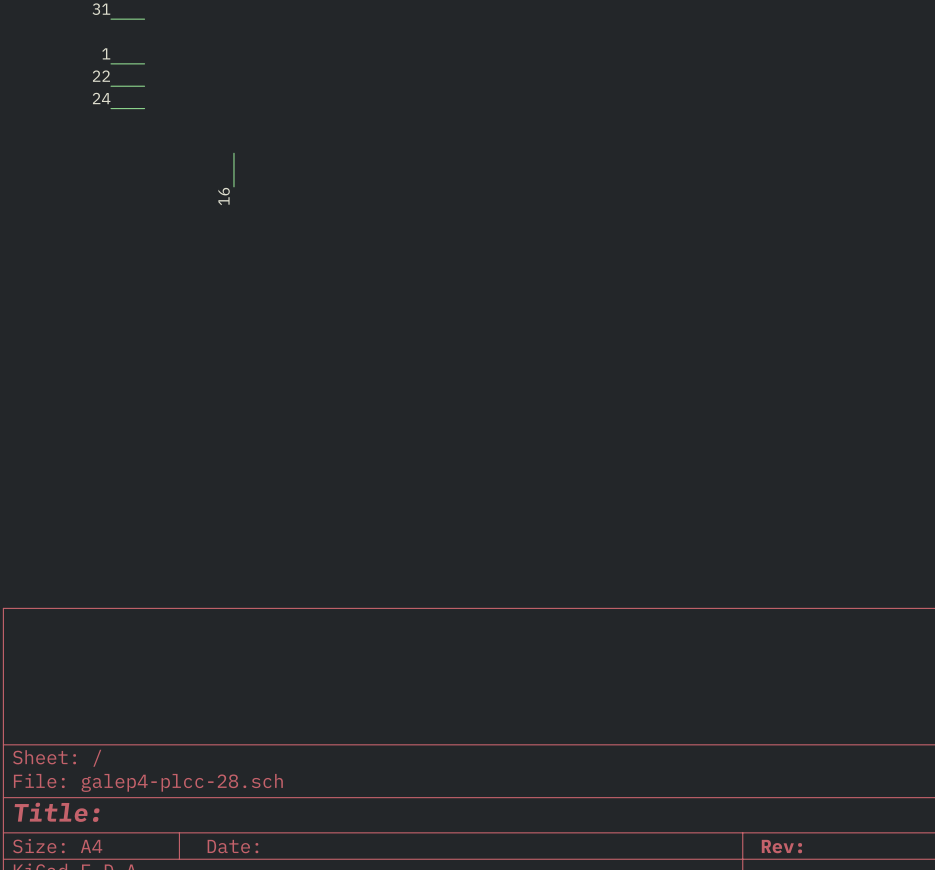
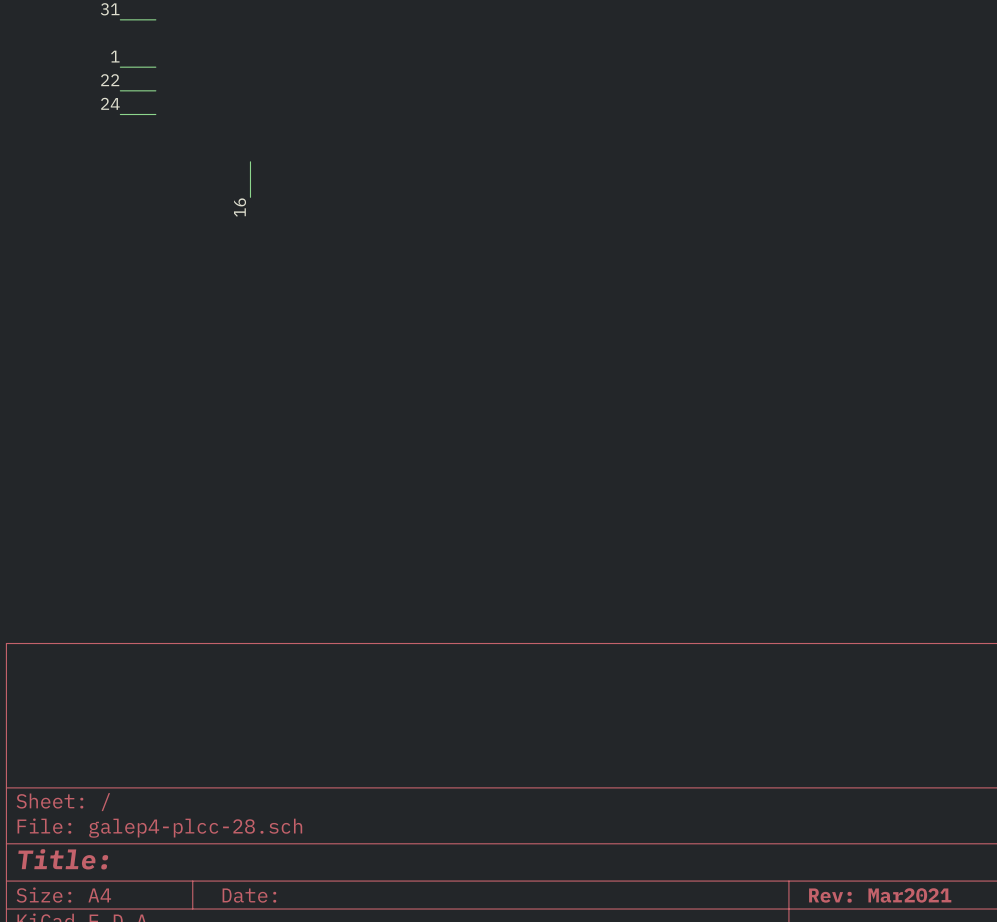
title block: Rev: (781, 846) -> Rev: Mar2021 (880, 895)

